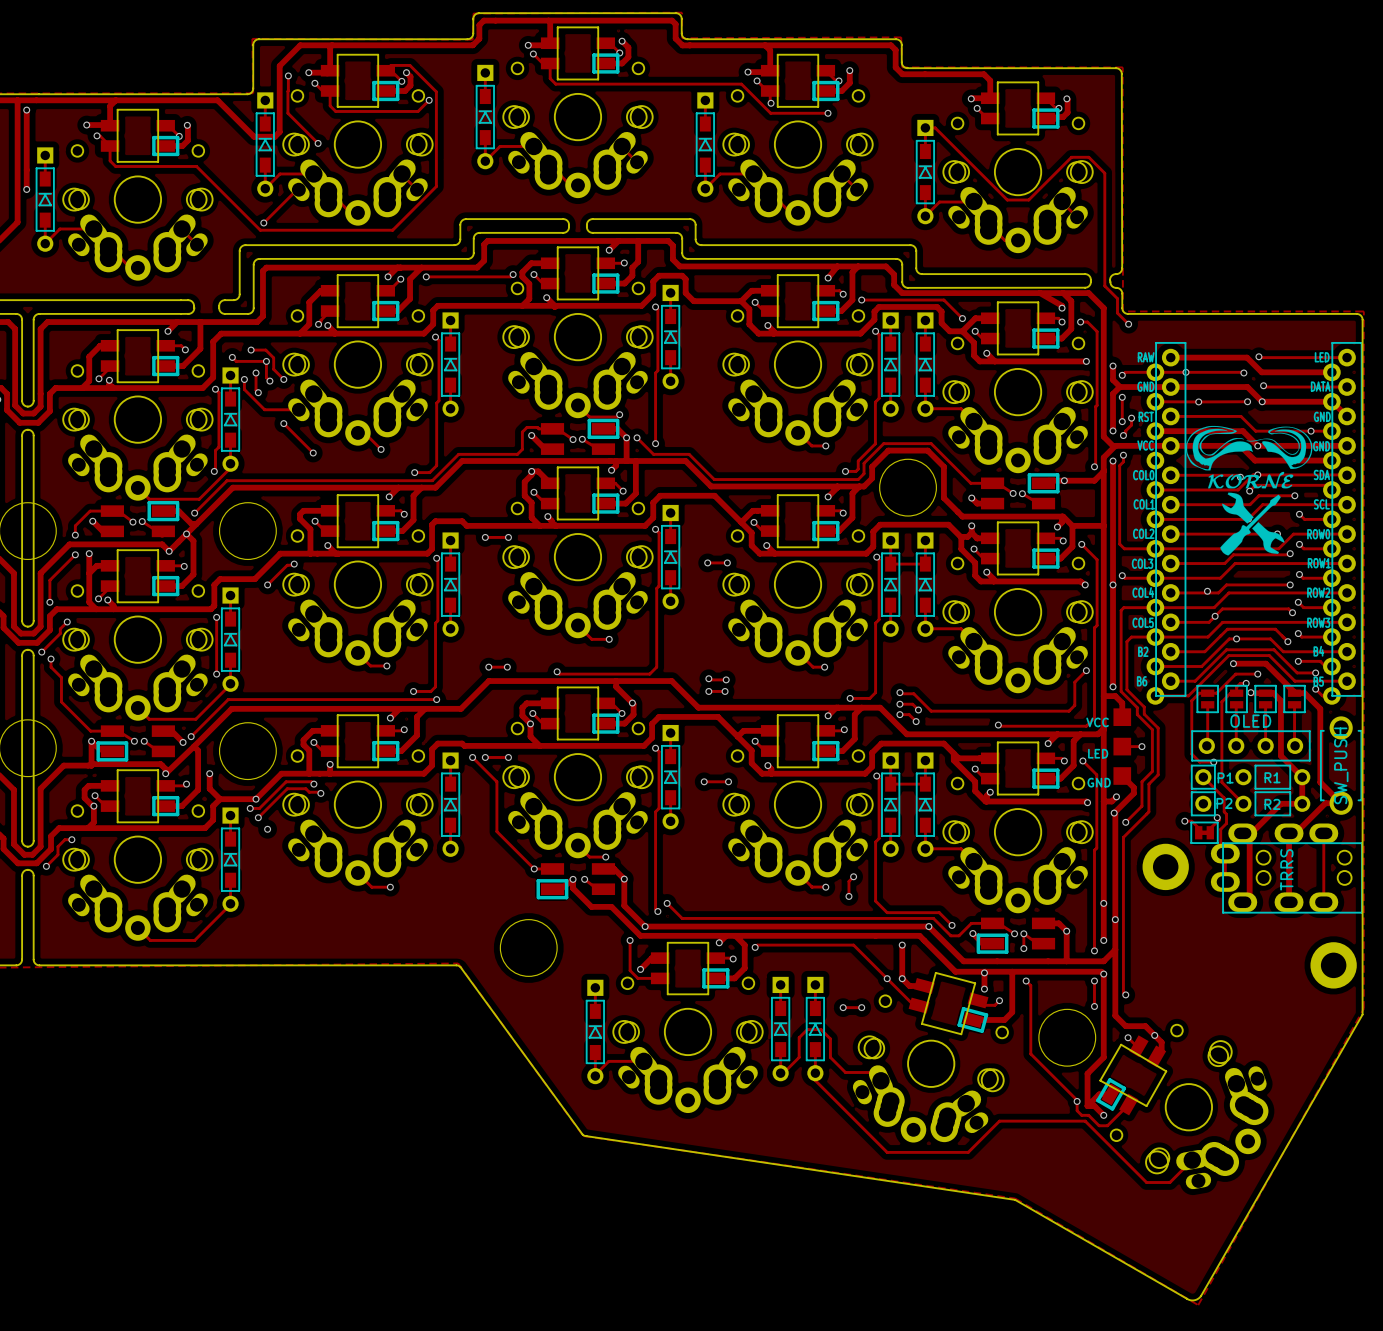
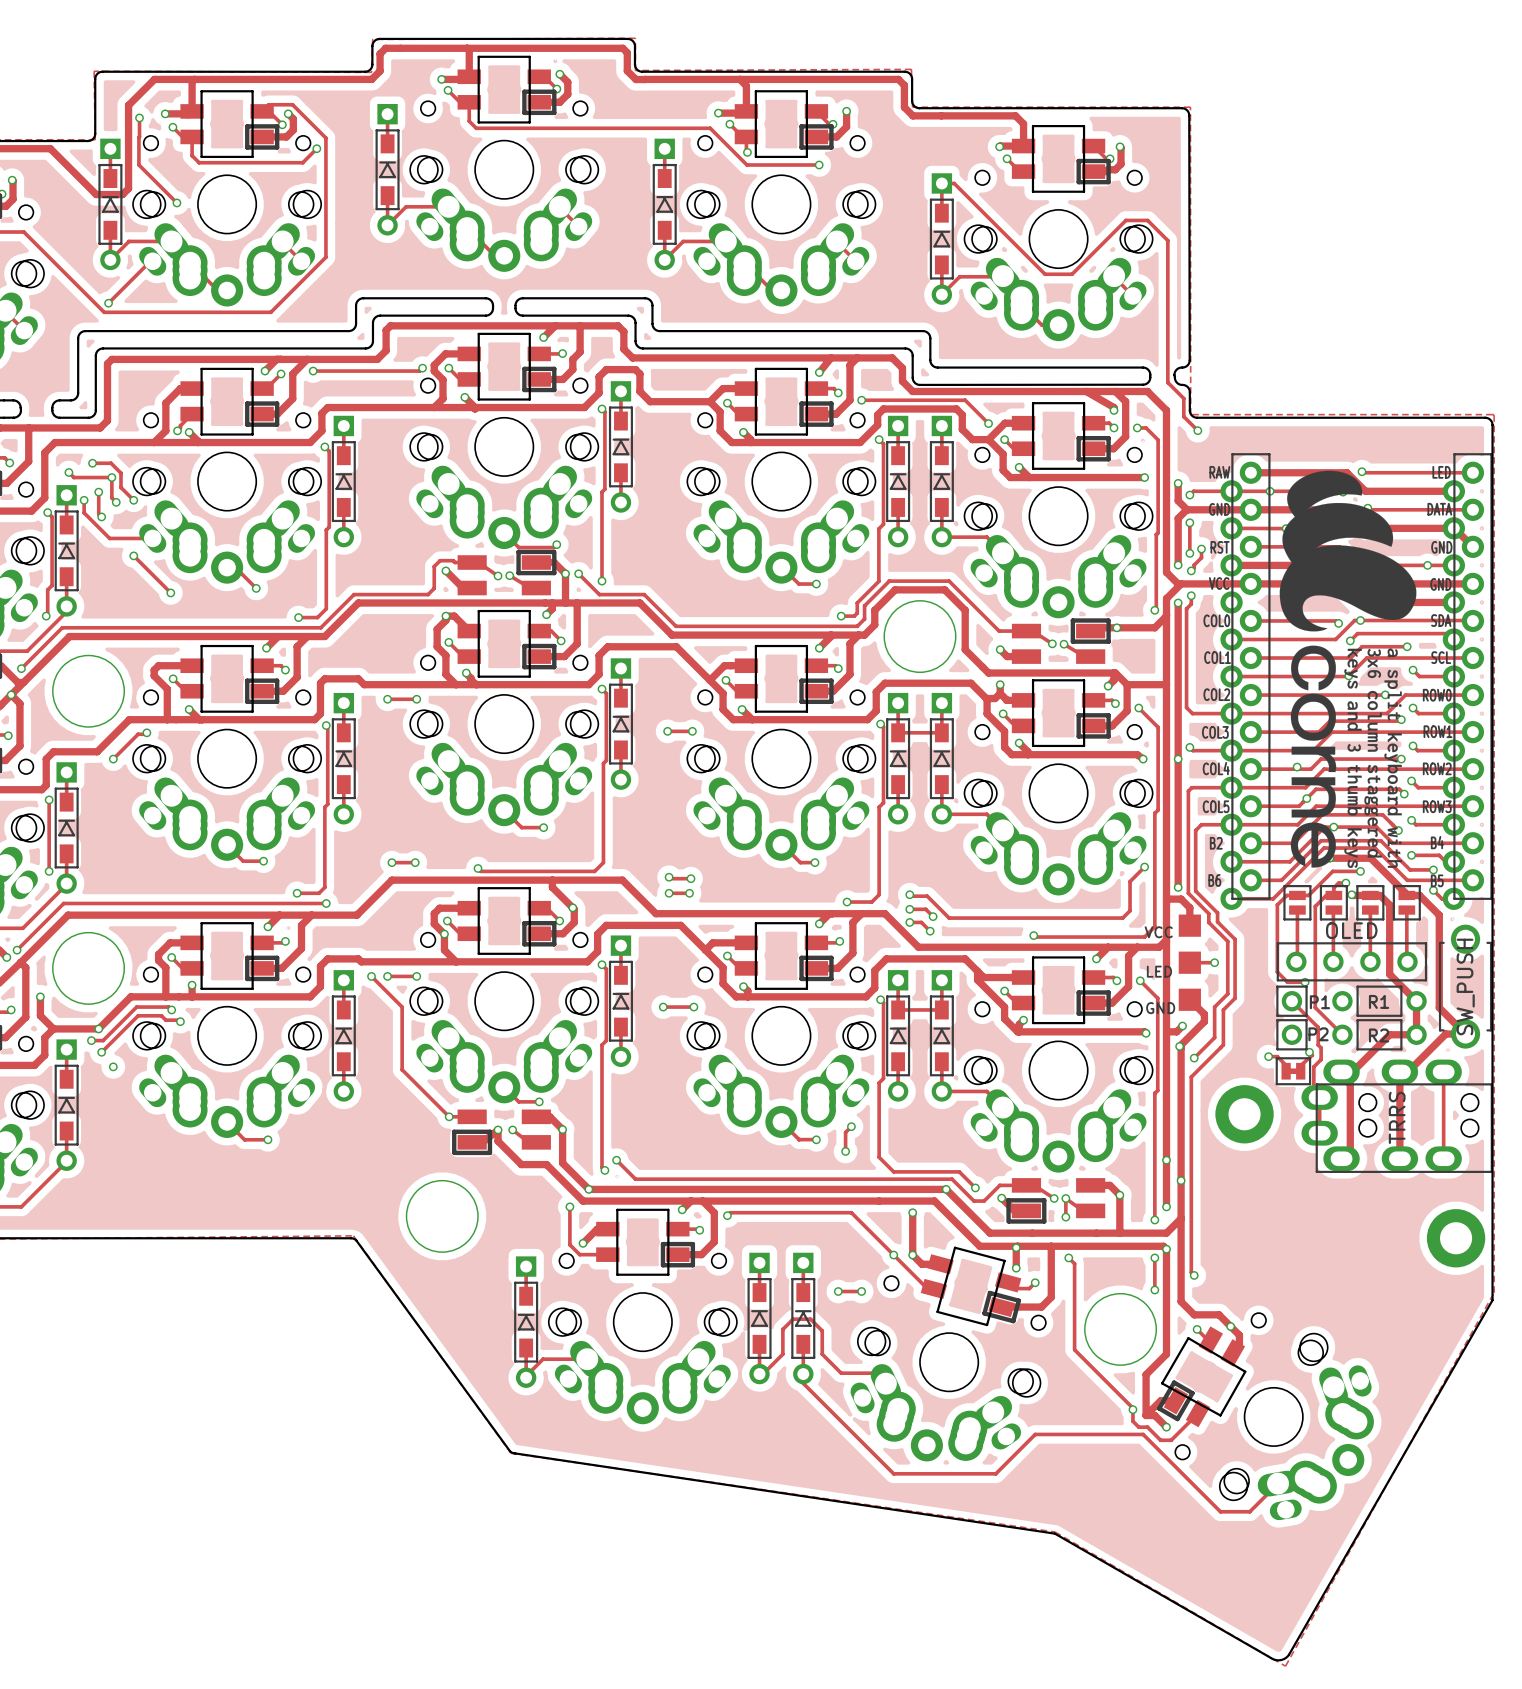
drawing: none -> [1279, 470, 1417, 869]
drawing: [1185, 425, 1313, 556] -> none

